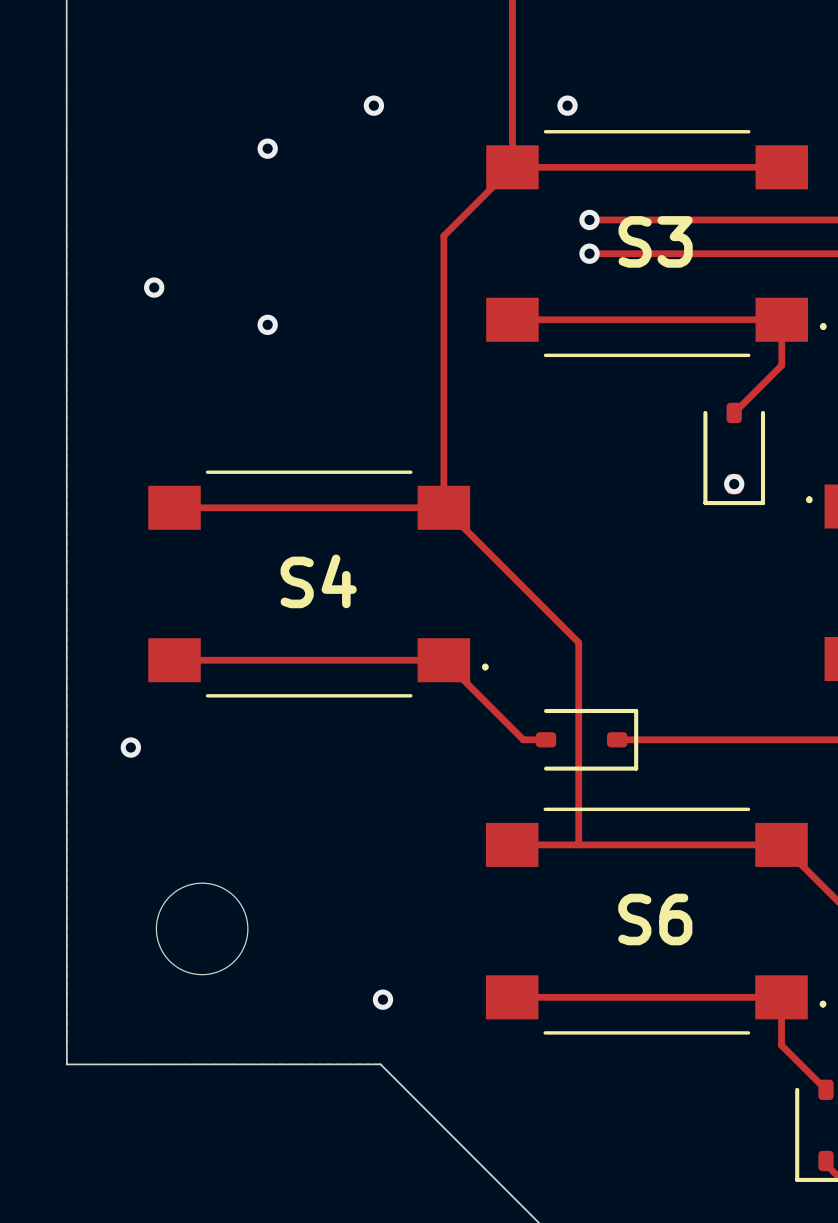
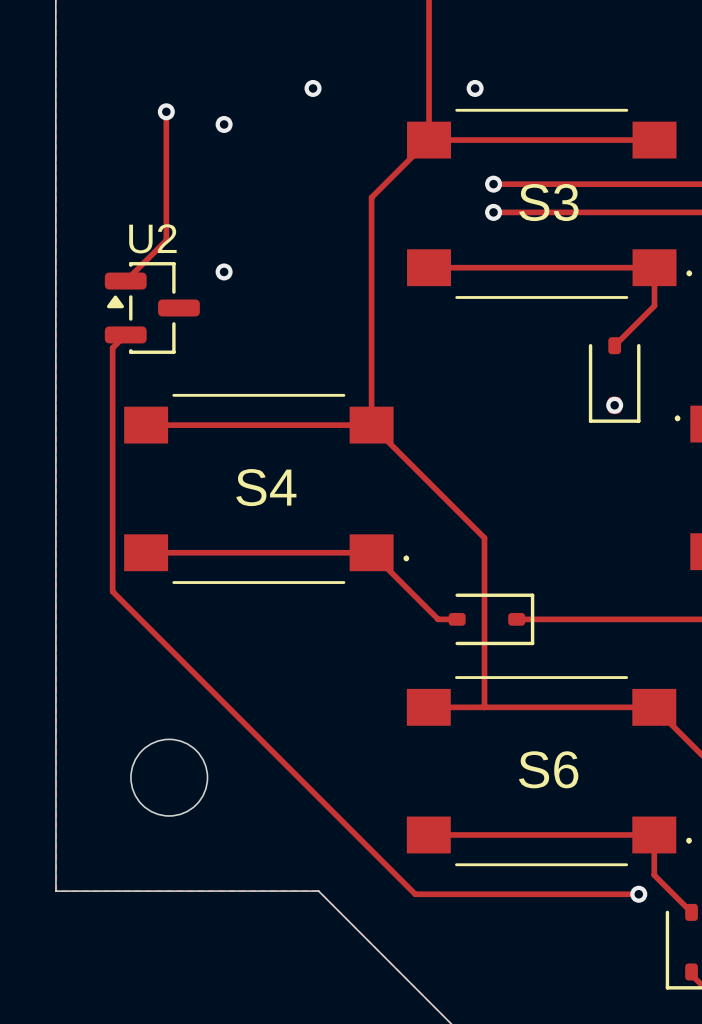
track: none -> (166, 111) (166, 240) (125, 281)
via position: (154, 287) -> (166, 111)
U2: none -> (152, 307)
track: none -> (125, 334) (112, 348) (112, 591) (415, 894) (638, 894)
via: (130, 747) -> none
via: (382, 999) -> none
via: none -> (638, 894)

